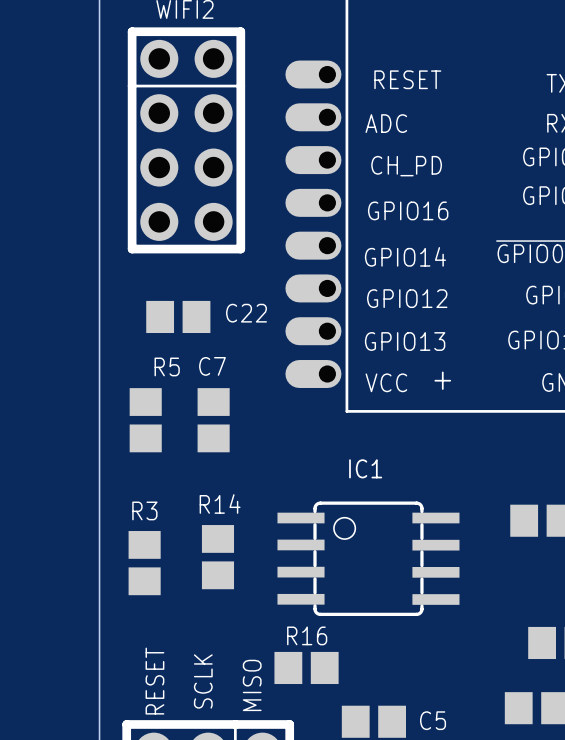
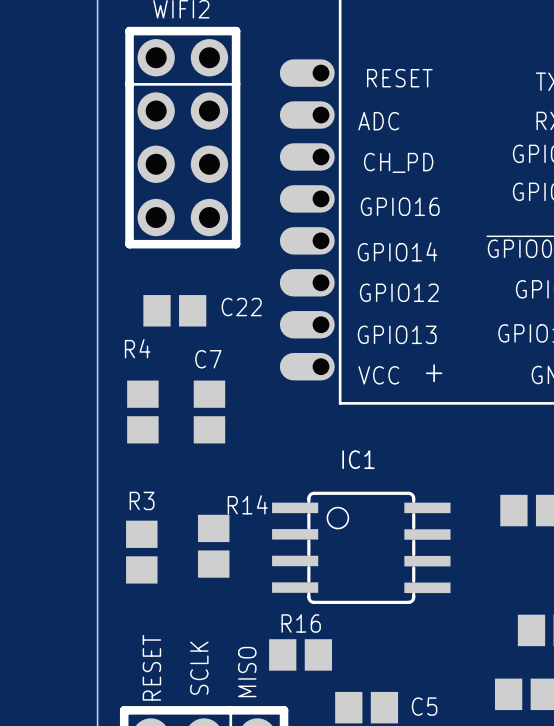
R5 name: R5 (167, 366) -> R4 (137, 348)
R14 name position: R14 (220, 504) -> R14 (247, 504)

